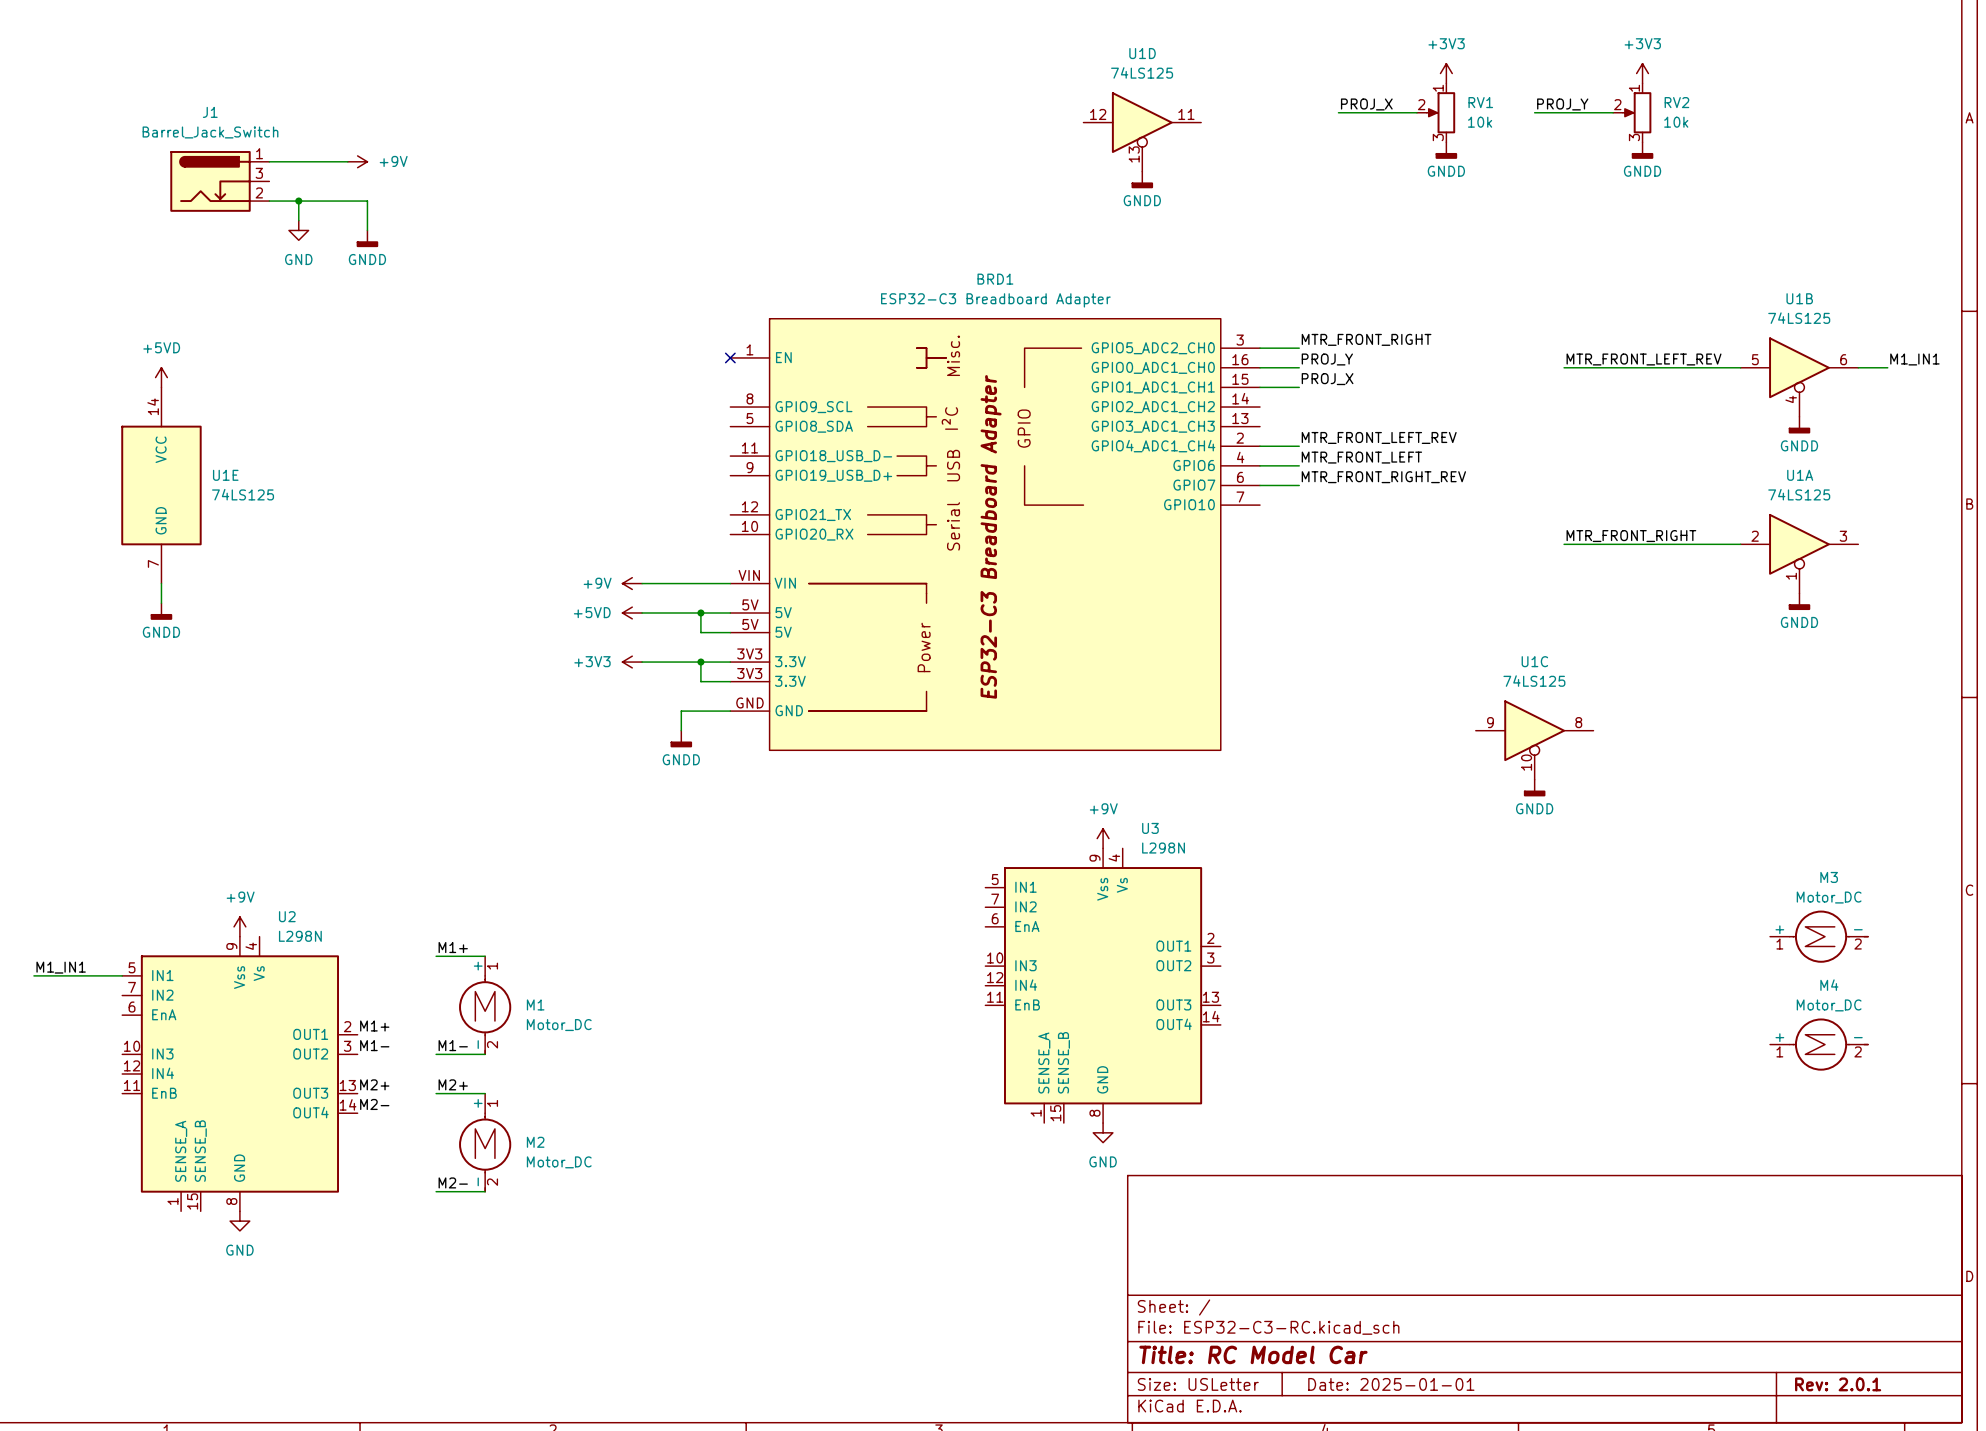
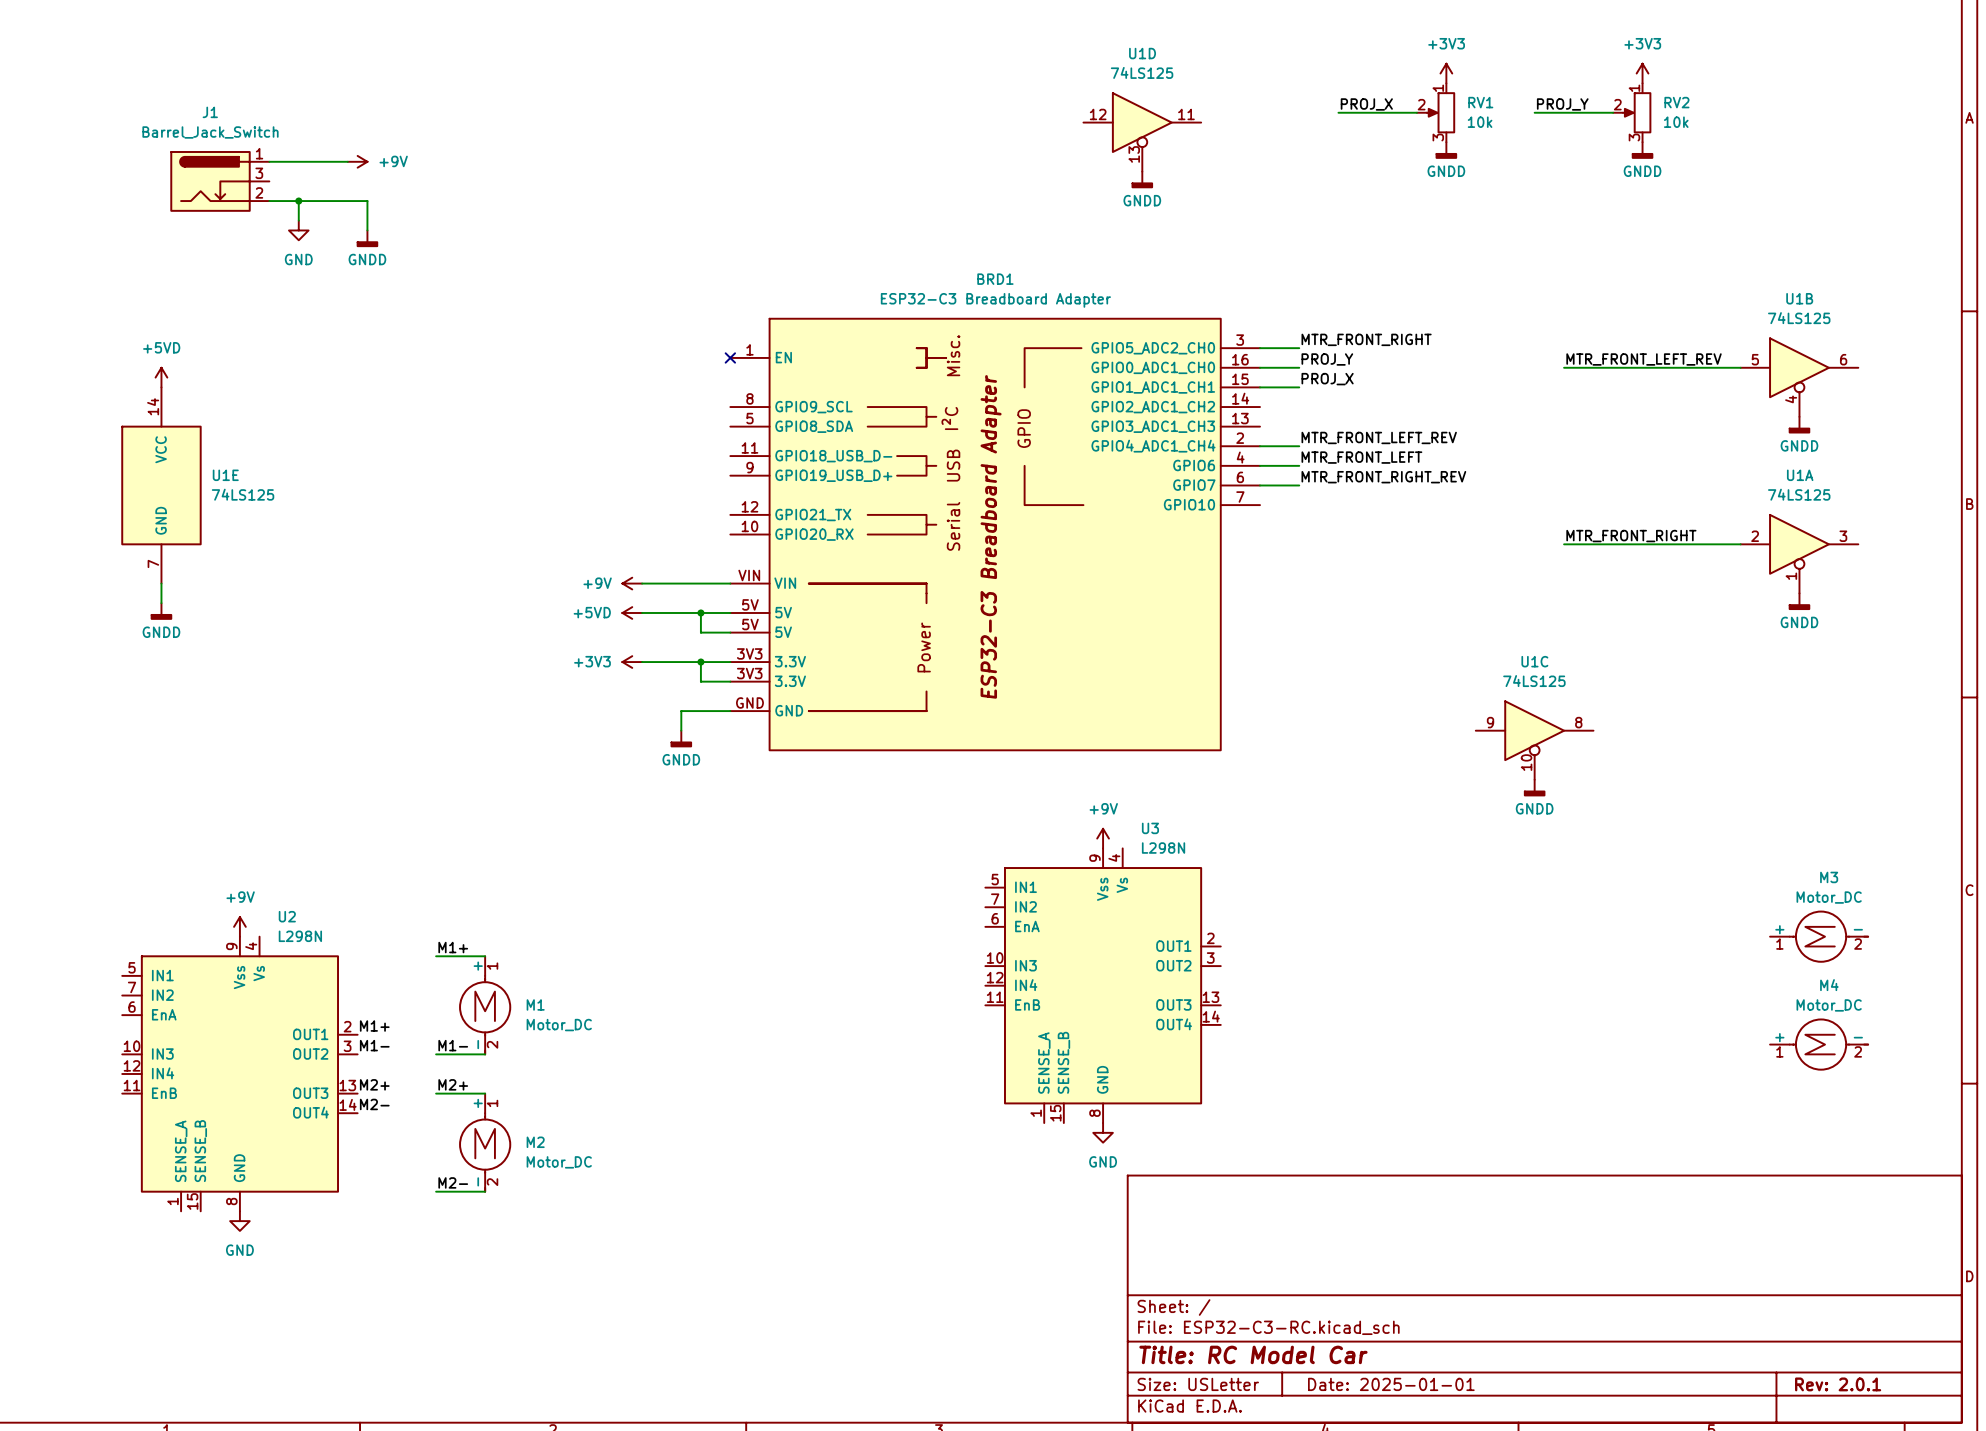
label: M1_IN1 (1914, 359) -> none
wire: (1858, 367) (1887, 367) -> none
label: M1_IN1 (61, 967) -> none
wire: (33, 975) (122, 975) -> none

